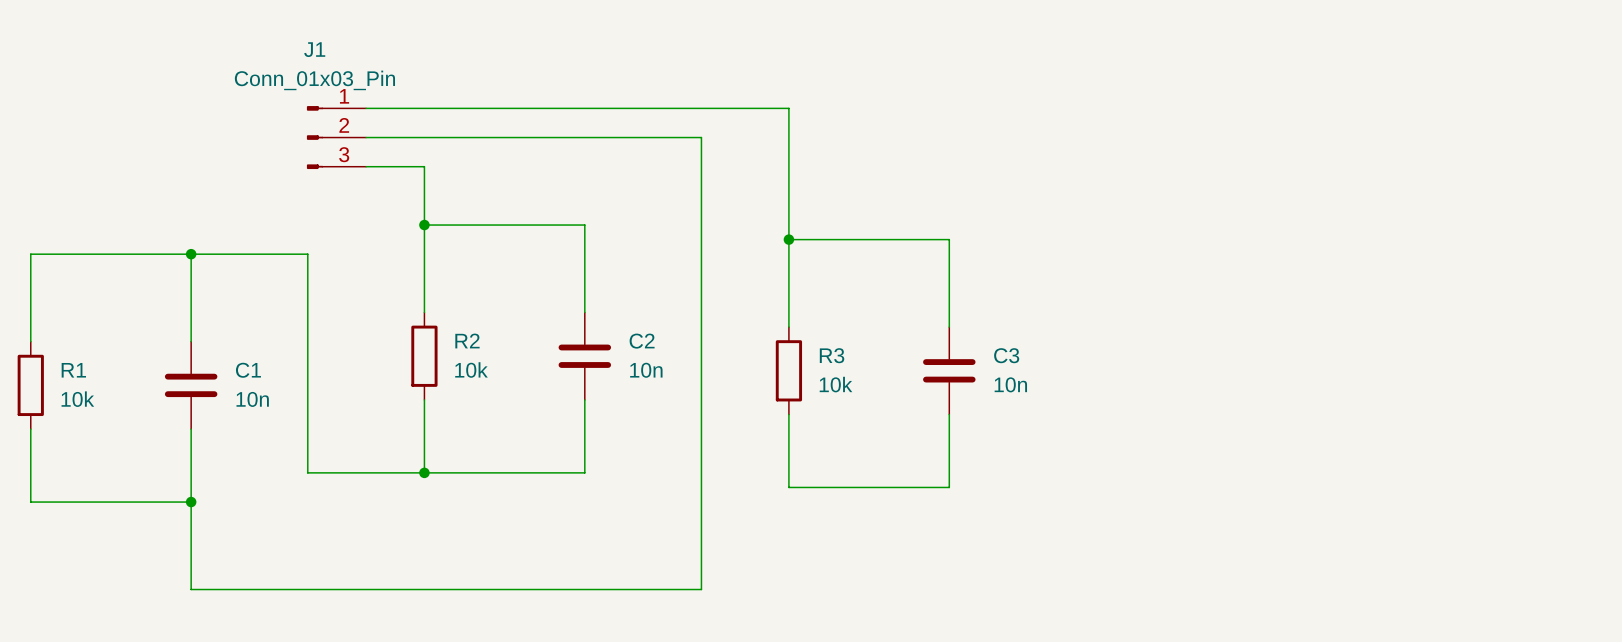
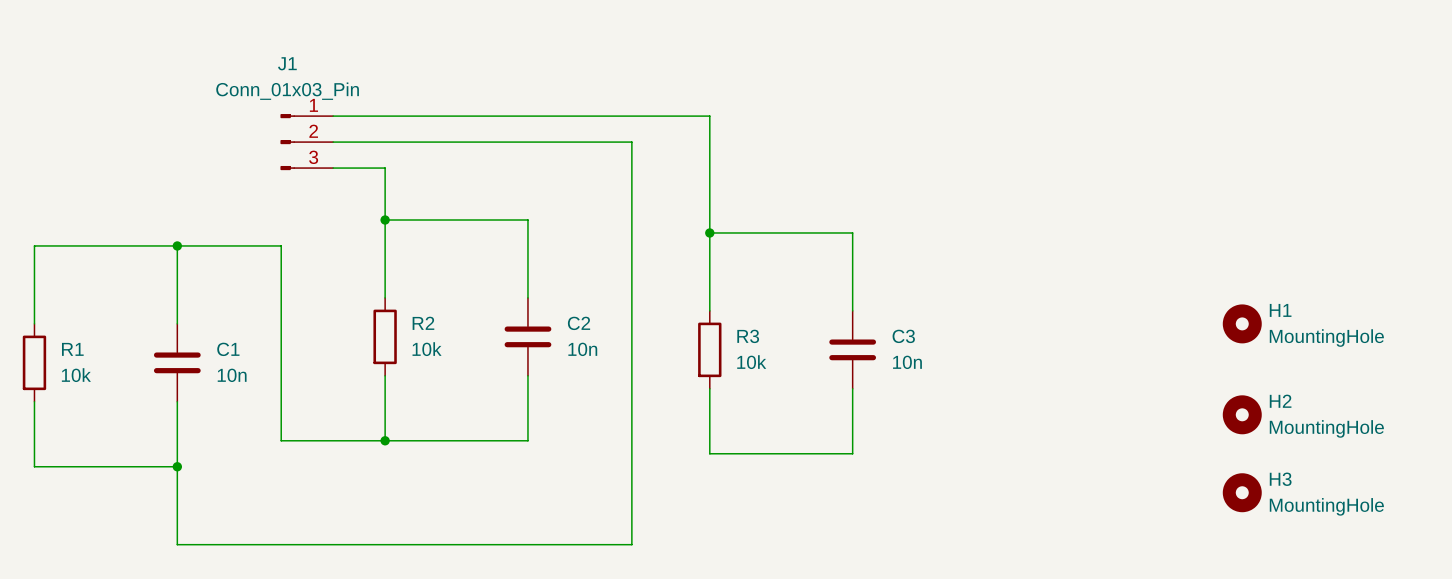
H1: none -> MountingHole (1242, 323)
H2: none -> MountingHole (1242, 414)
H3: none -> MountingHole (1242, 492)

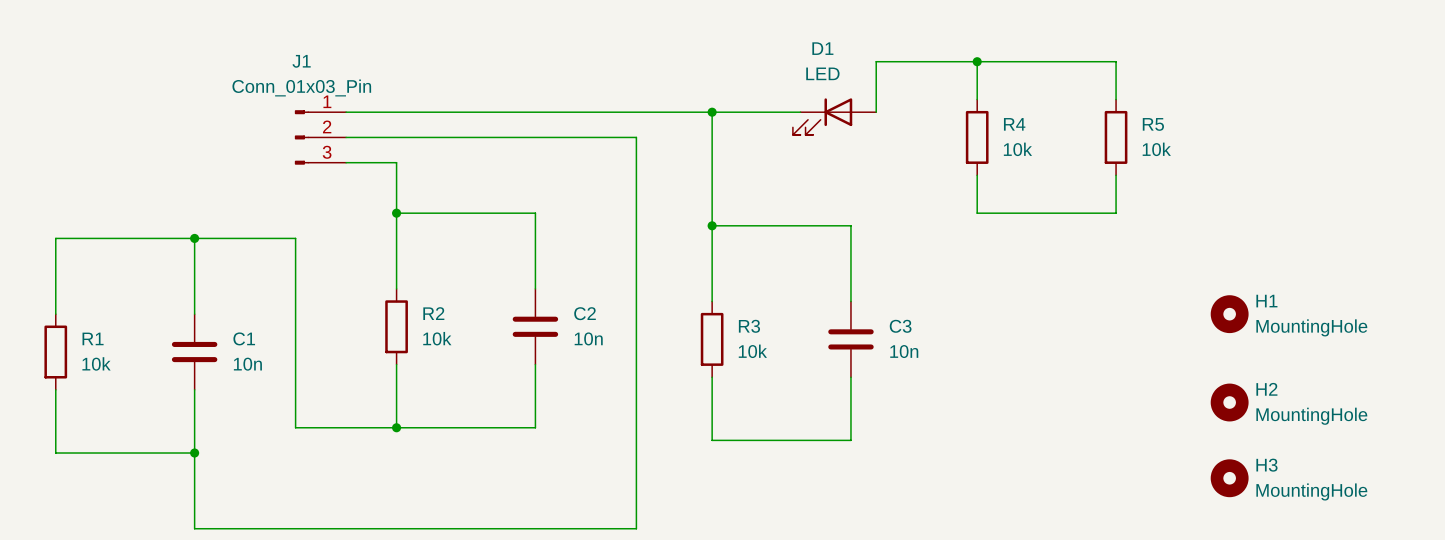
wire: none -> (977, 61) (977, 99)
junction: none -> (977, 61)
wire: none -> (1116, 99) (1116, 61) (876, 61) (876, 112)
wire: none -> (712, 112) (800, 112)
junction: none -> (712, 112)
D1: none -> LED (834, 116)
R4: none -> 10k (977, 137)
R5: none -> 10k (1116, 137)
wire: none -> (977, 175) (977, 213) (1116, 213) (1116, 175)

